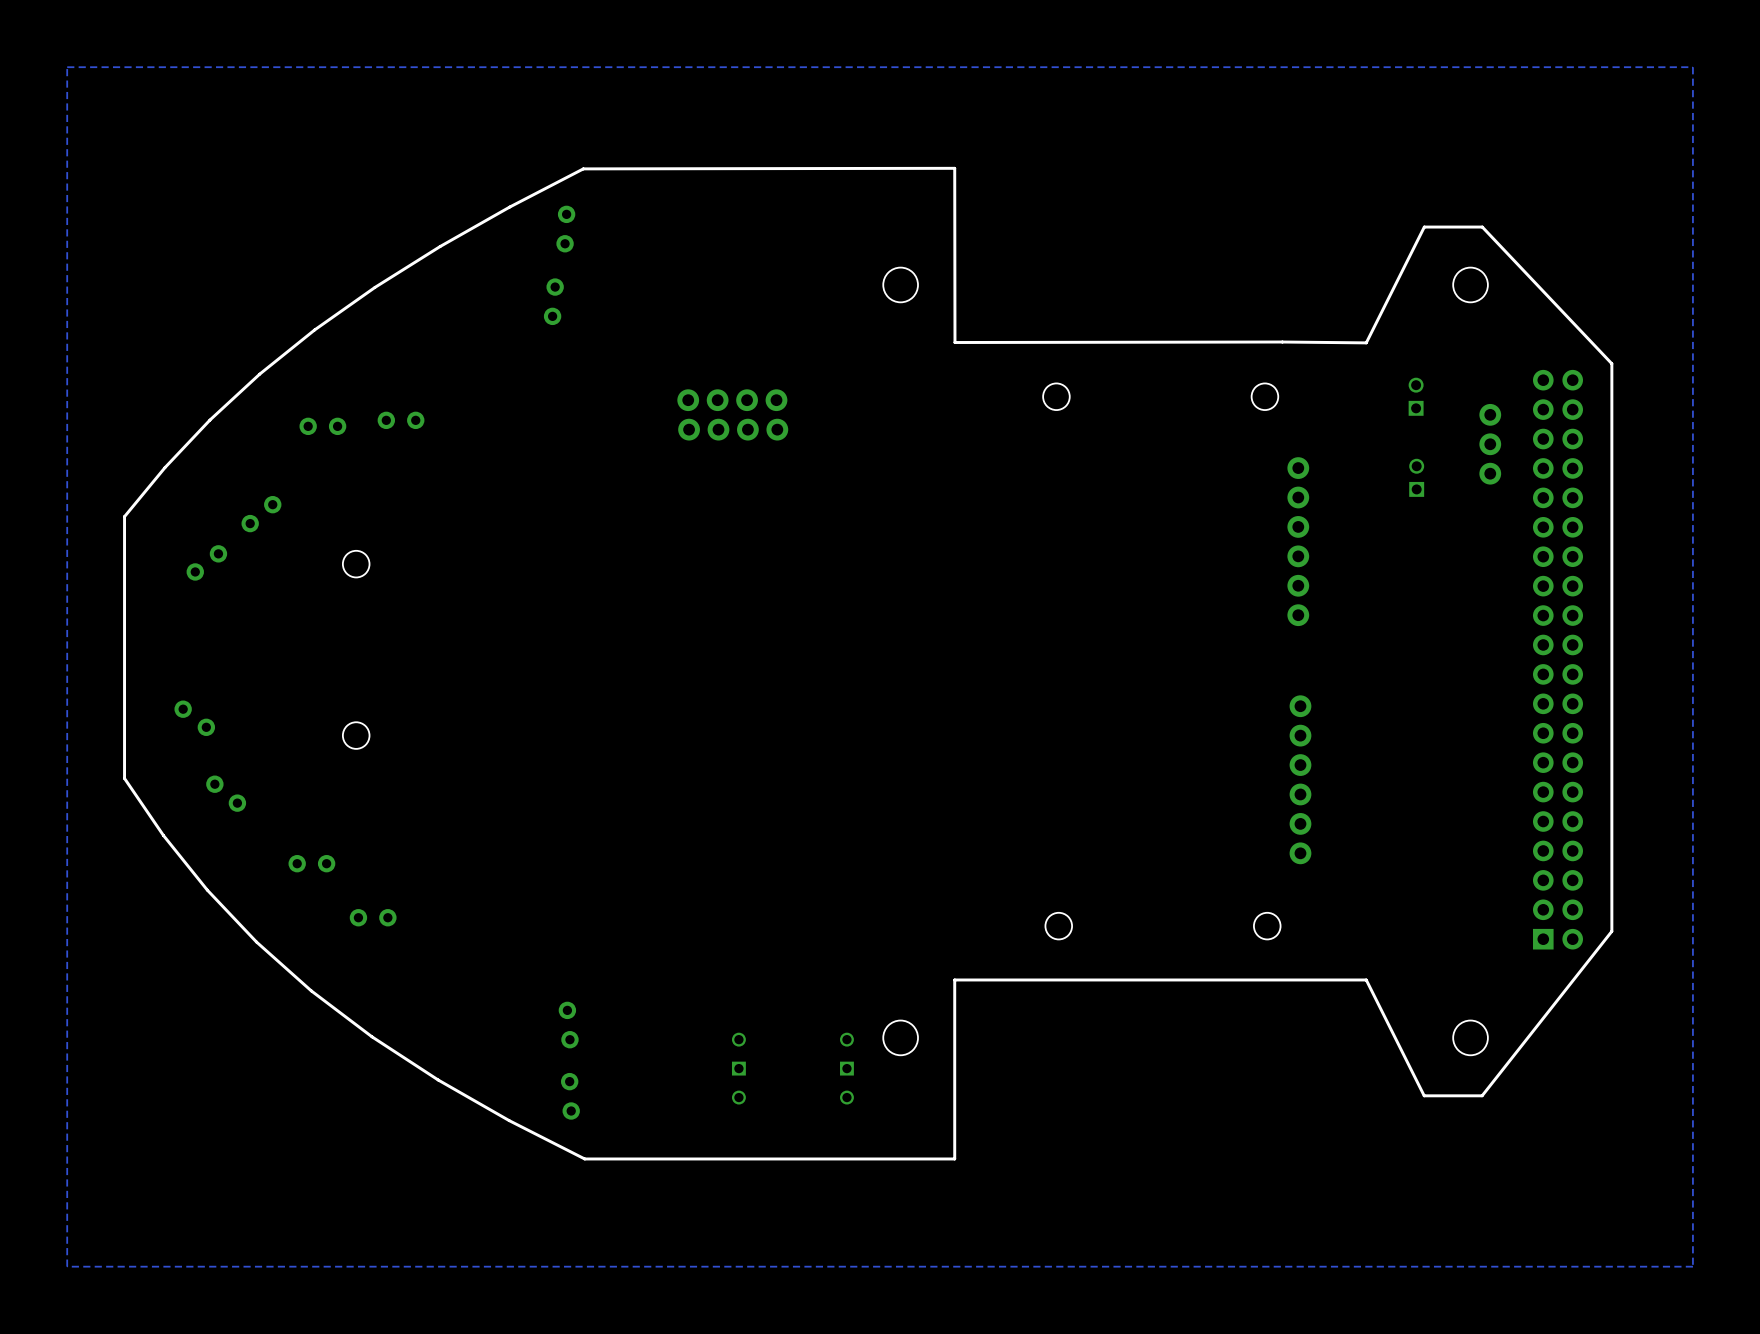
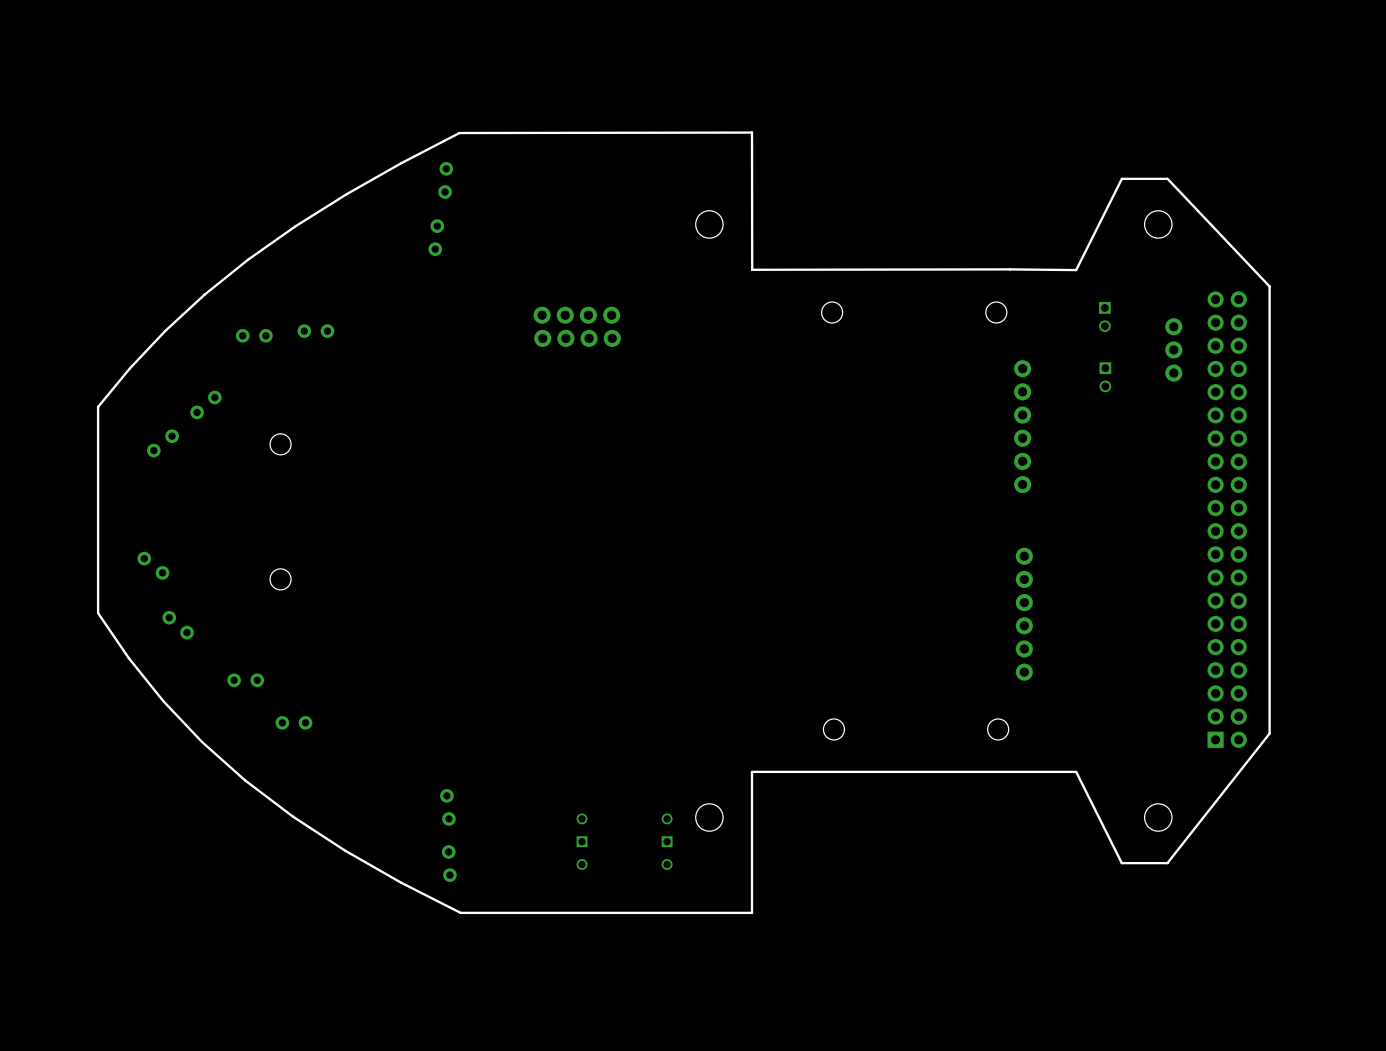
zone outline: (1692, 67) (1692, 1266) (67, 1266) (67, 67) (1692, 67) -> none
part rotation: 0° (1416, 396) -> 180° (1104, 317)
part rotation: 0° (1416, 477) -> 180° (1105, 377)

